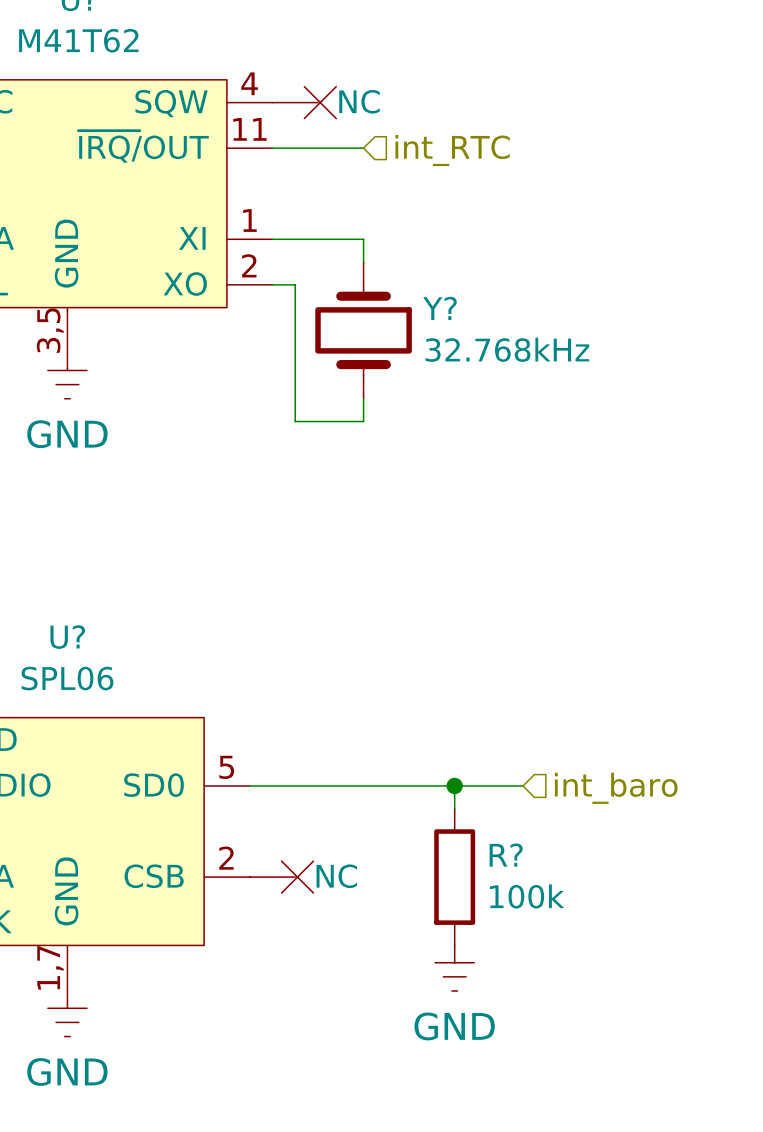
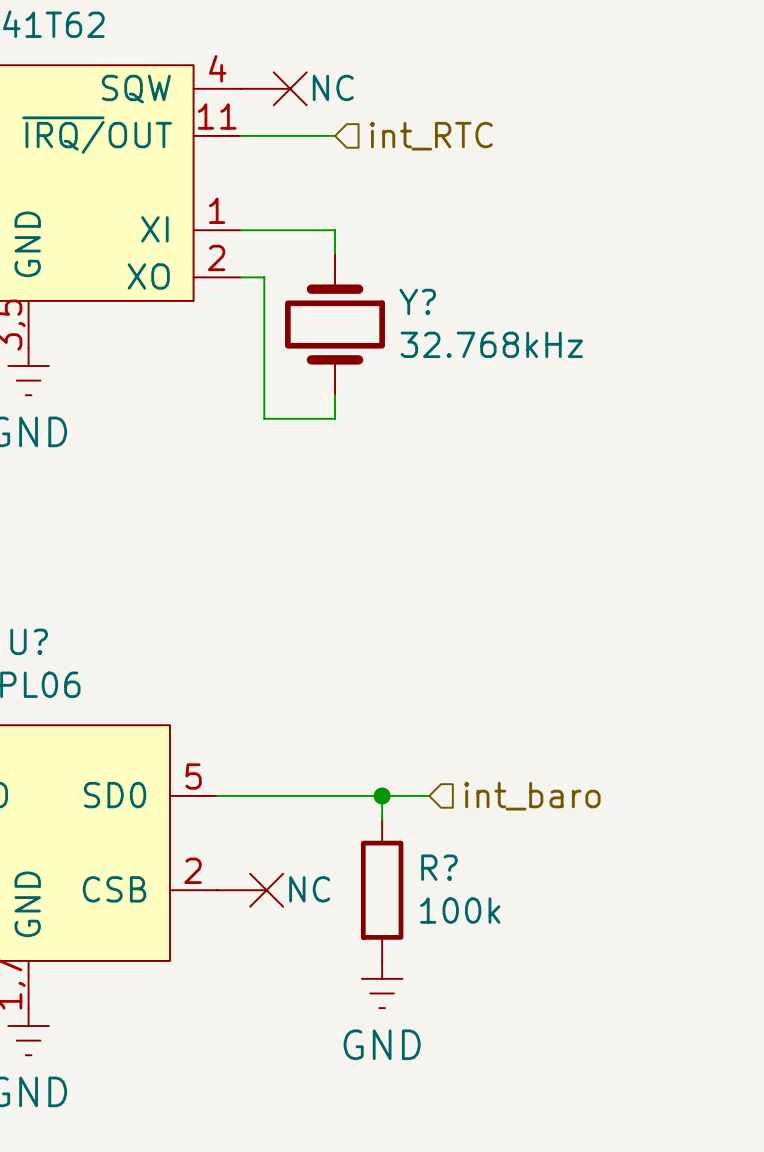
wire: none -> (382, 795) (382, 819)
junction position: (454, 785) -> (382, 795)
wire: (523, 785) (454, 785) (454, 808) -> none
hierarchical label position: int_baro (616, 788) -> int_baro (532, 796)
R? position: (454, 877) -> (382, 890)
power symbol position: GND (454, 968) -> GND (382, 984)

